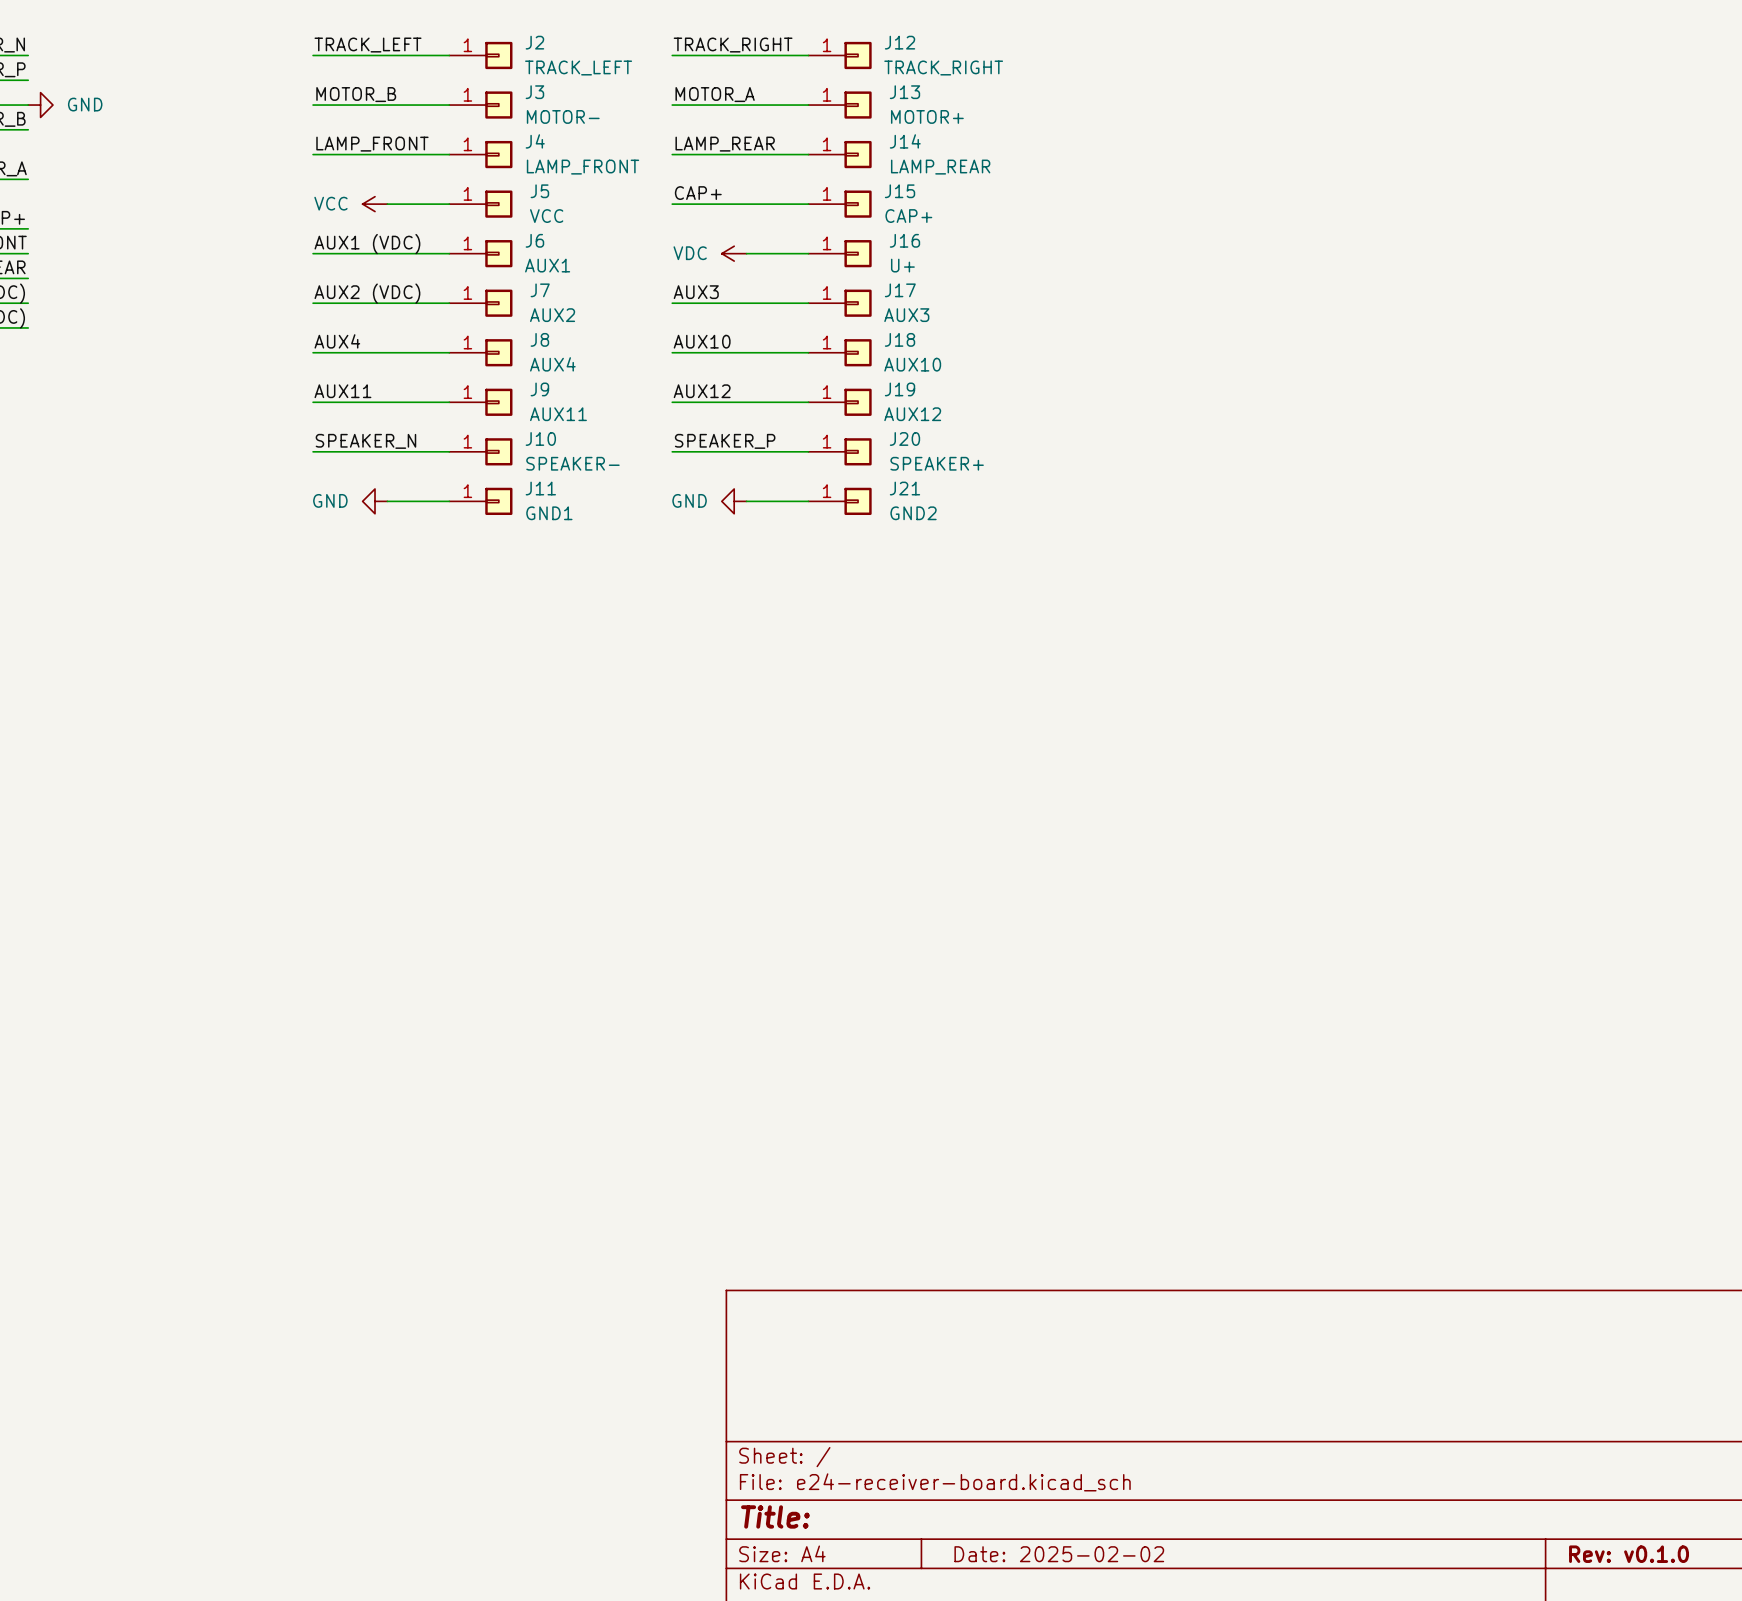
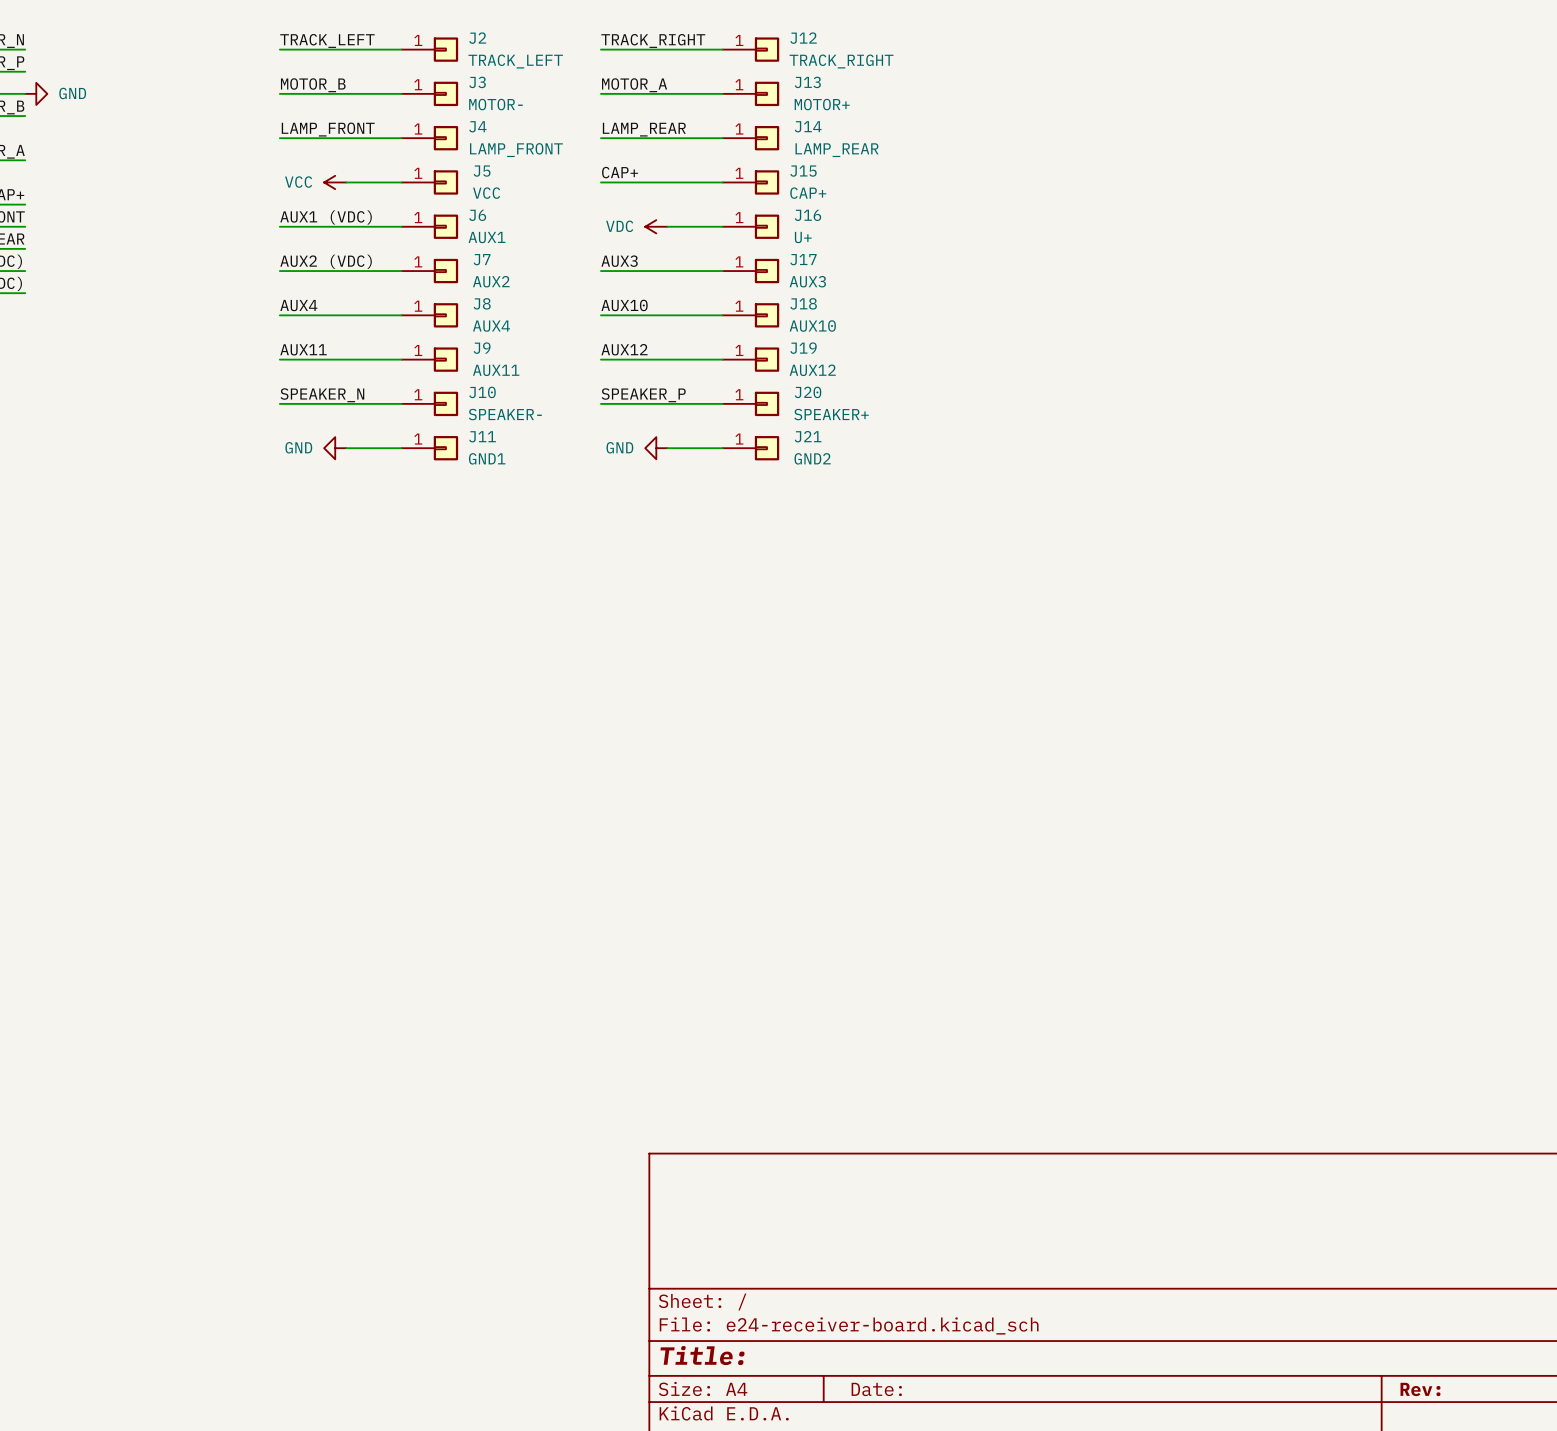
title block: Date: 2025-02-02 (1059, 1554) -> Date: (876, 1389)
title block: Rev: v0.1.0 (1629, 1554) -> Rev: (1420, 1389)

